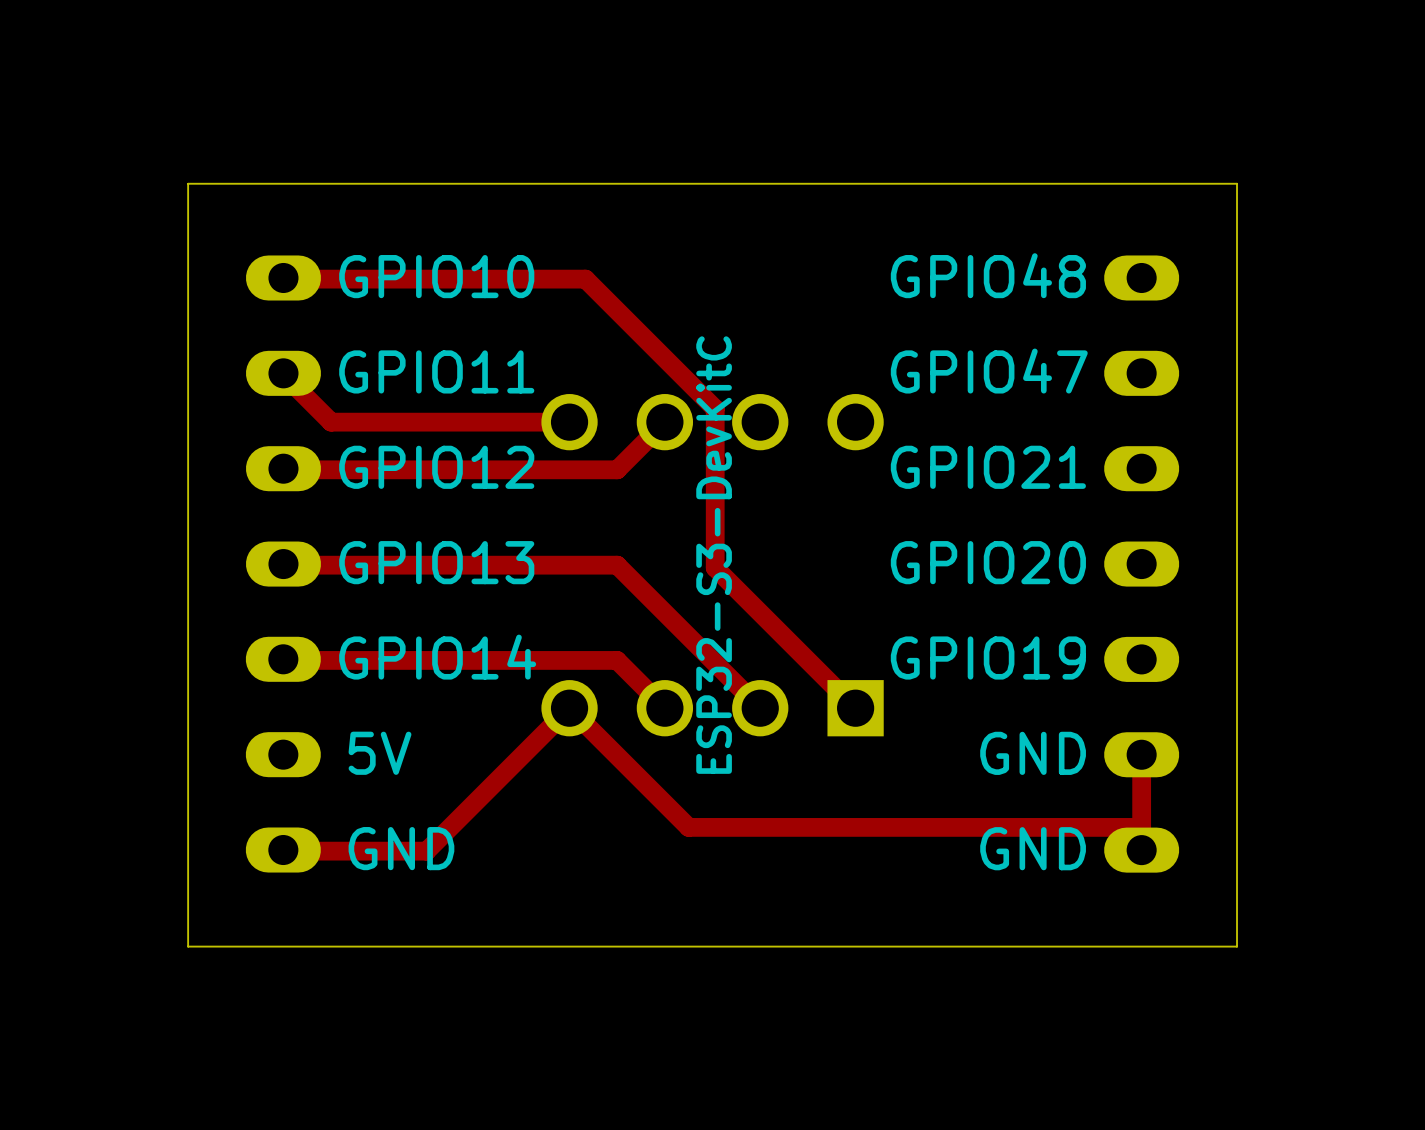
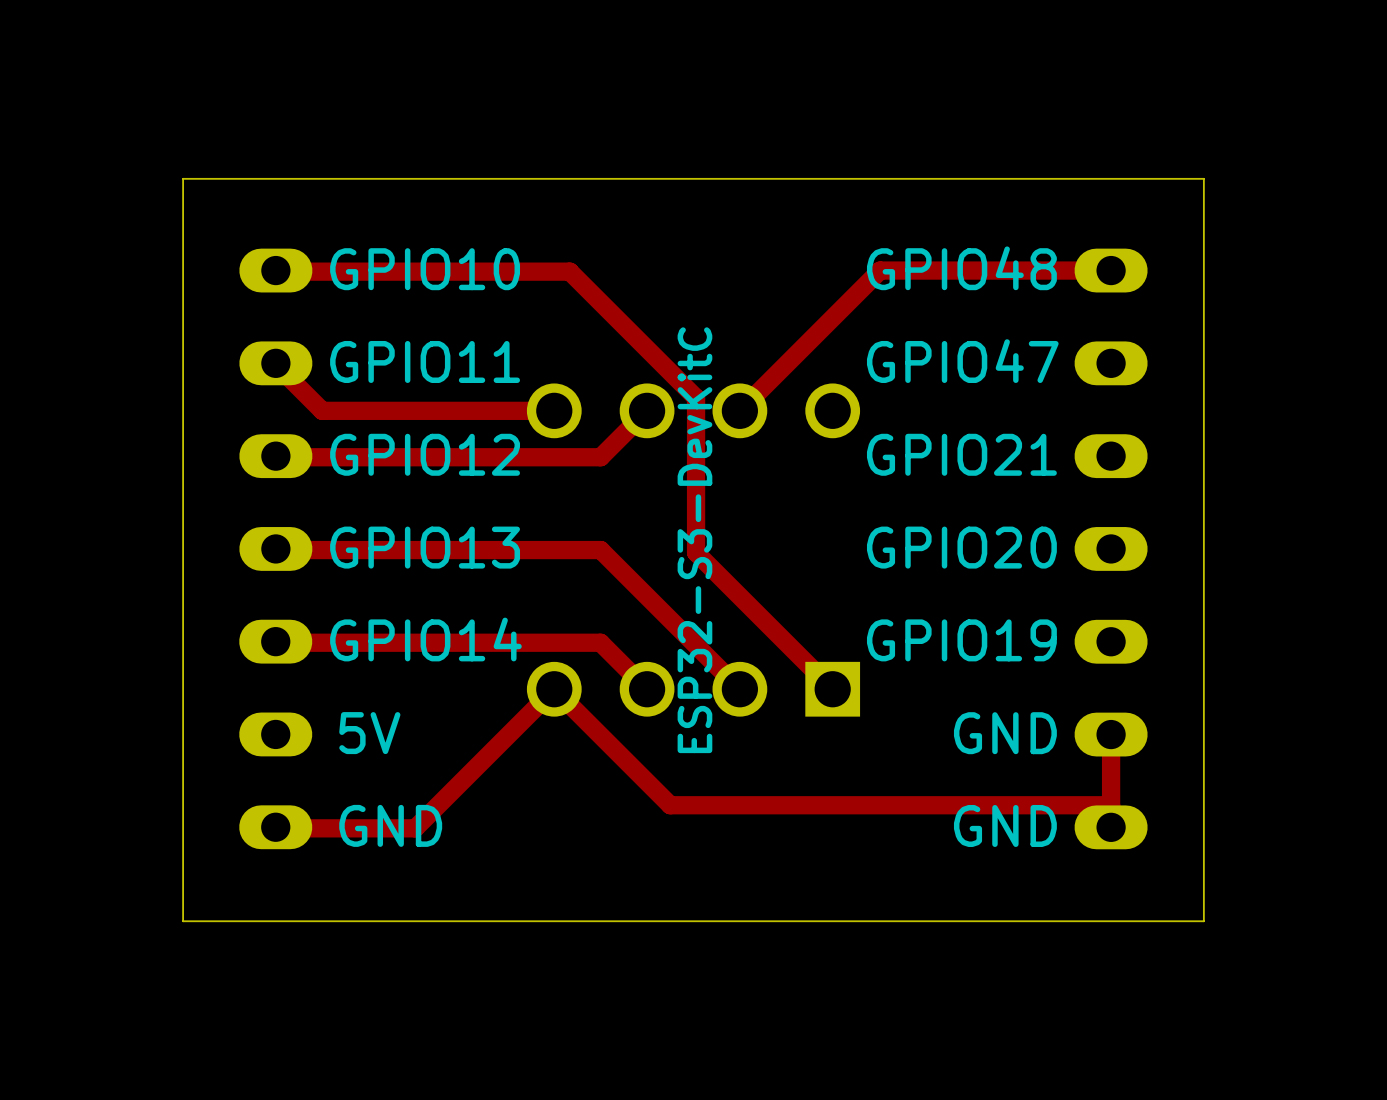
track: none -> (1111, 270) (880, 270) (739, 410)

